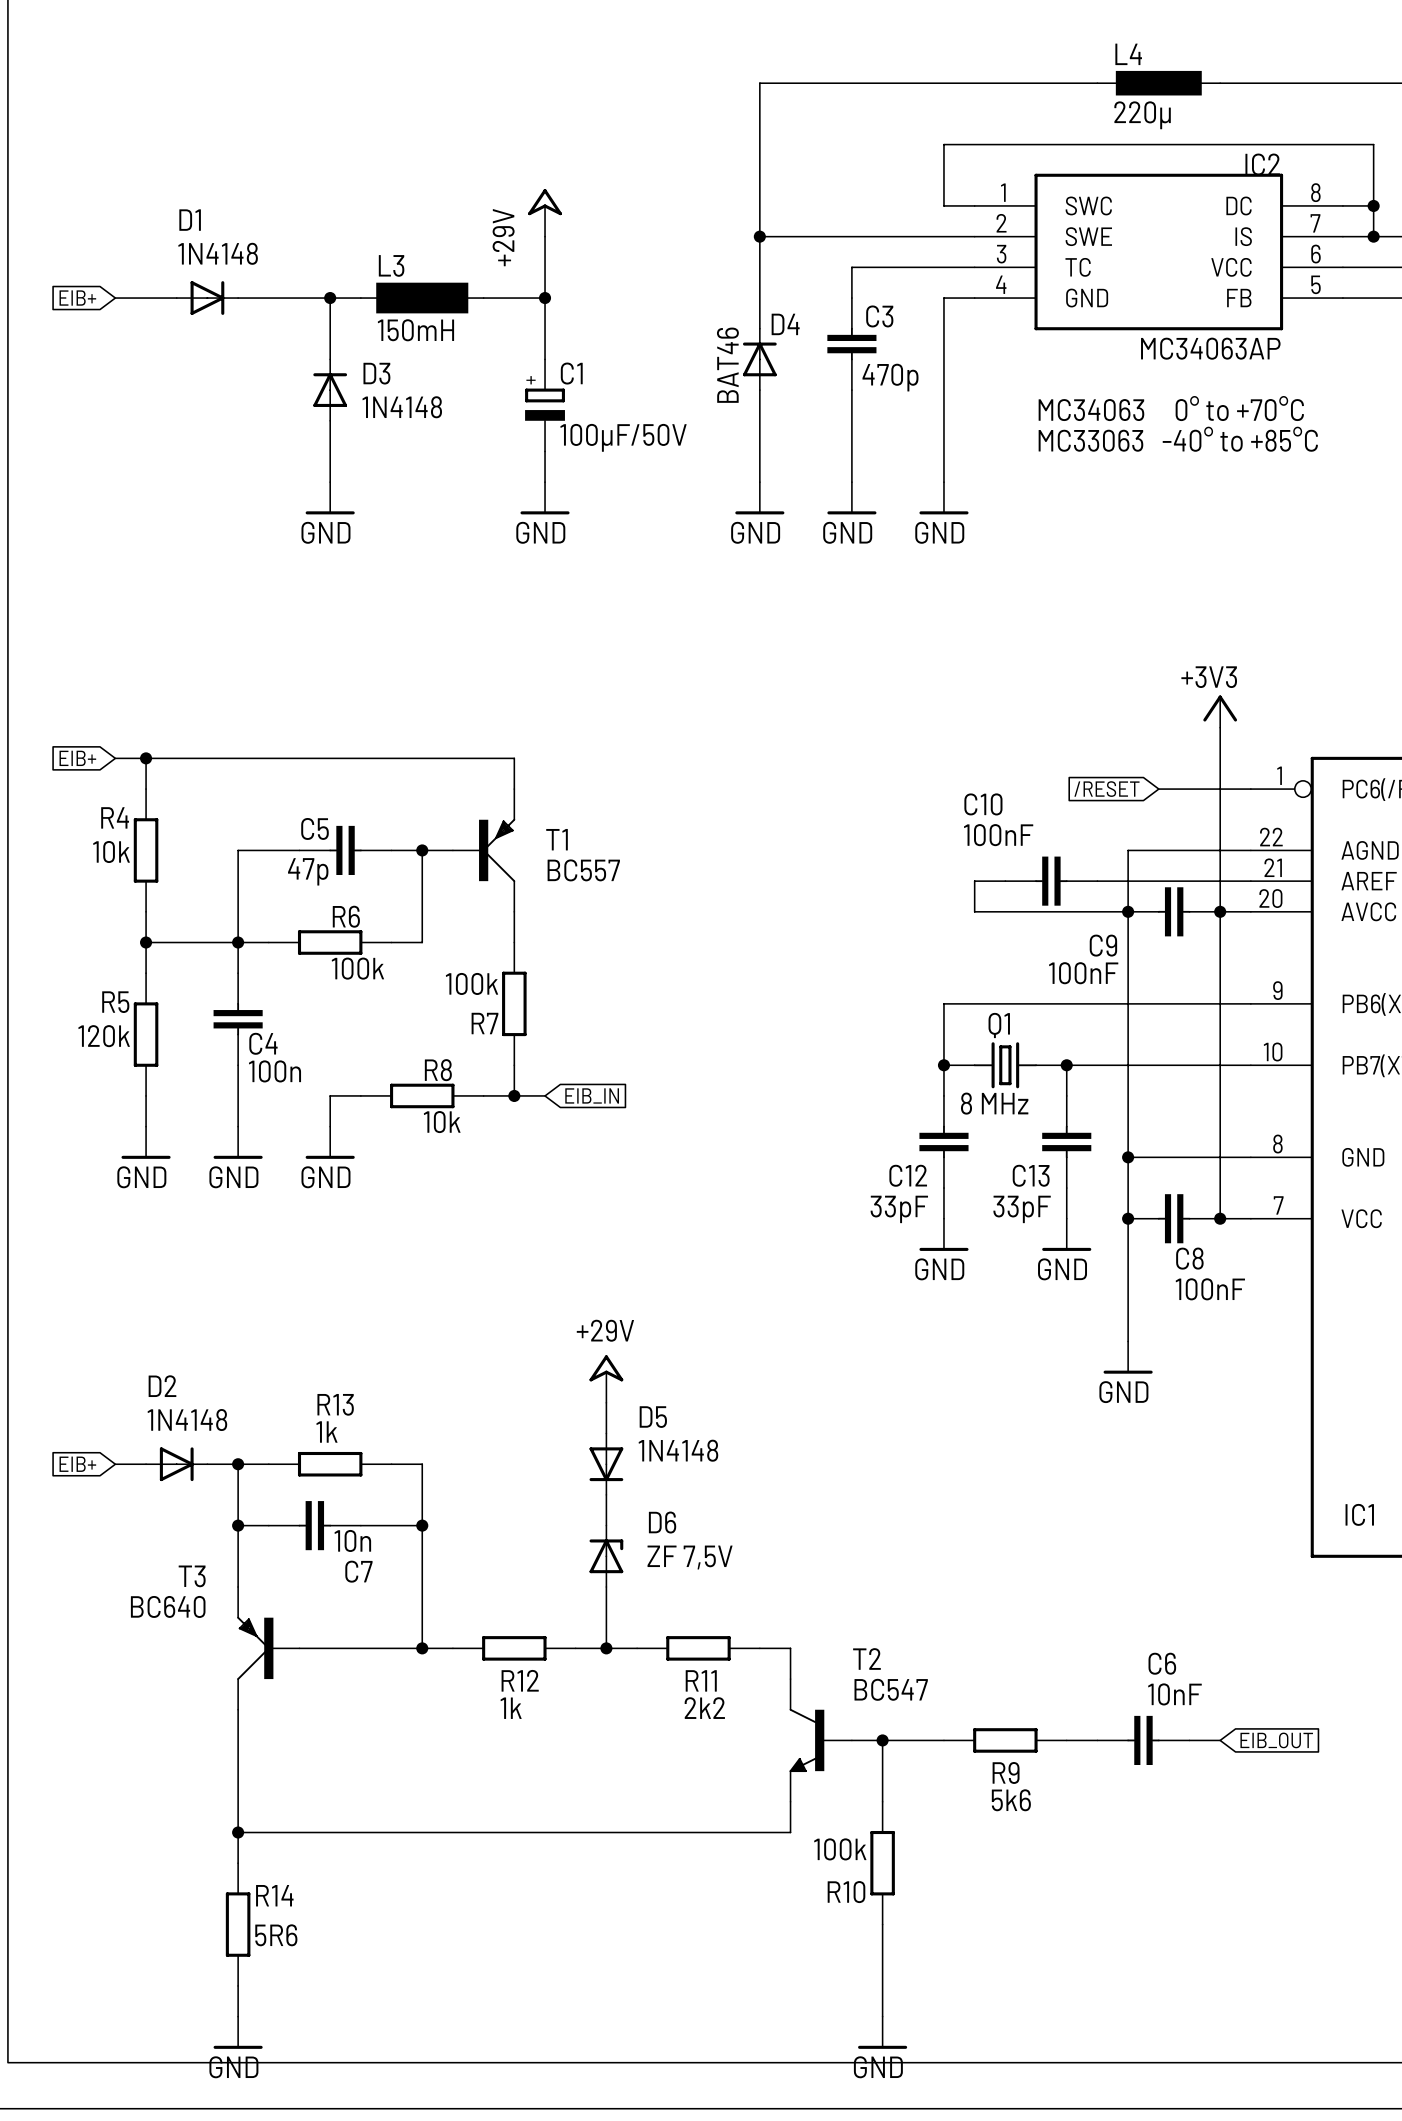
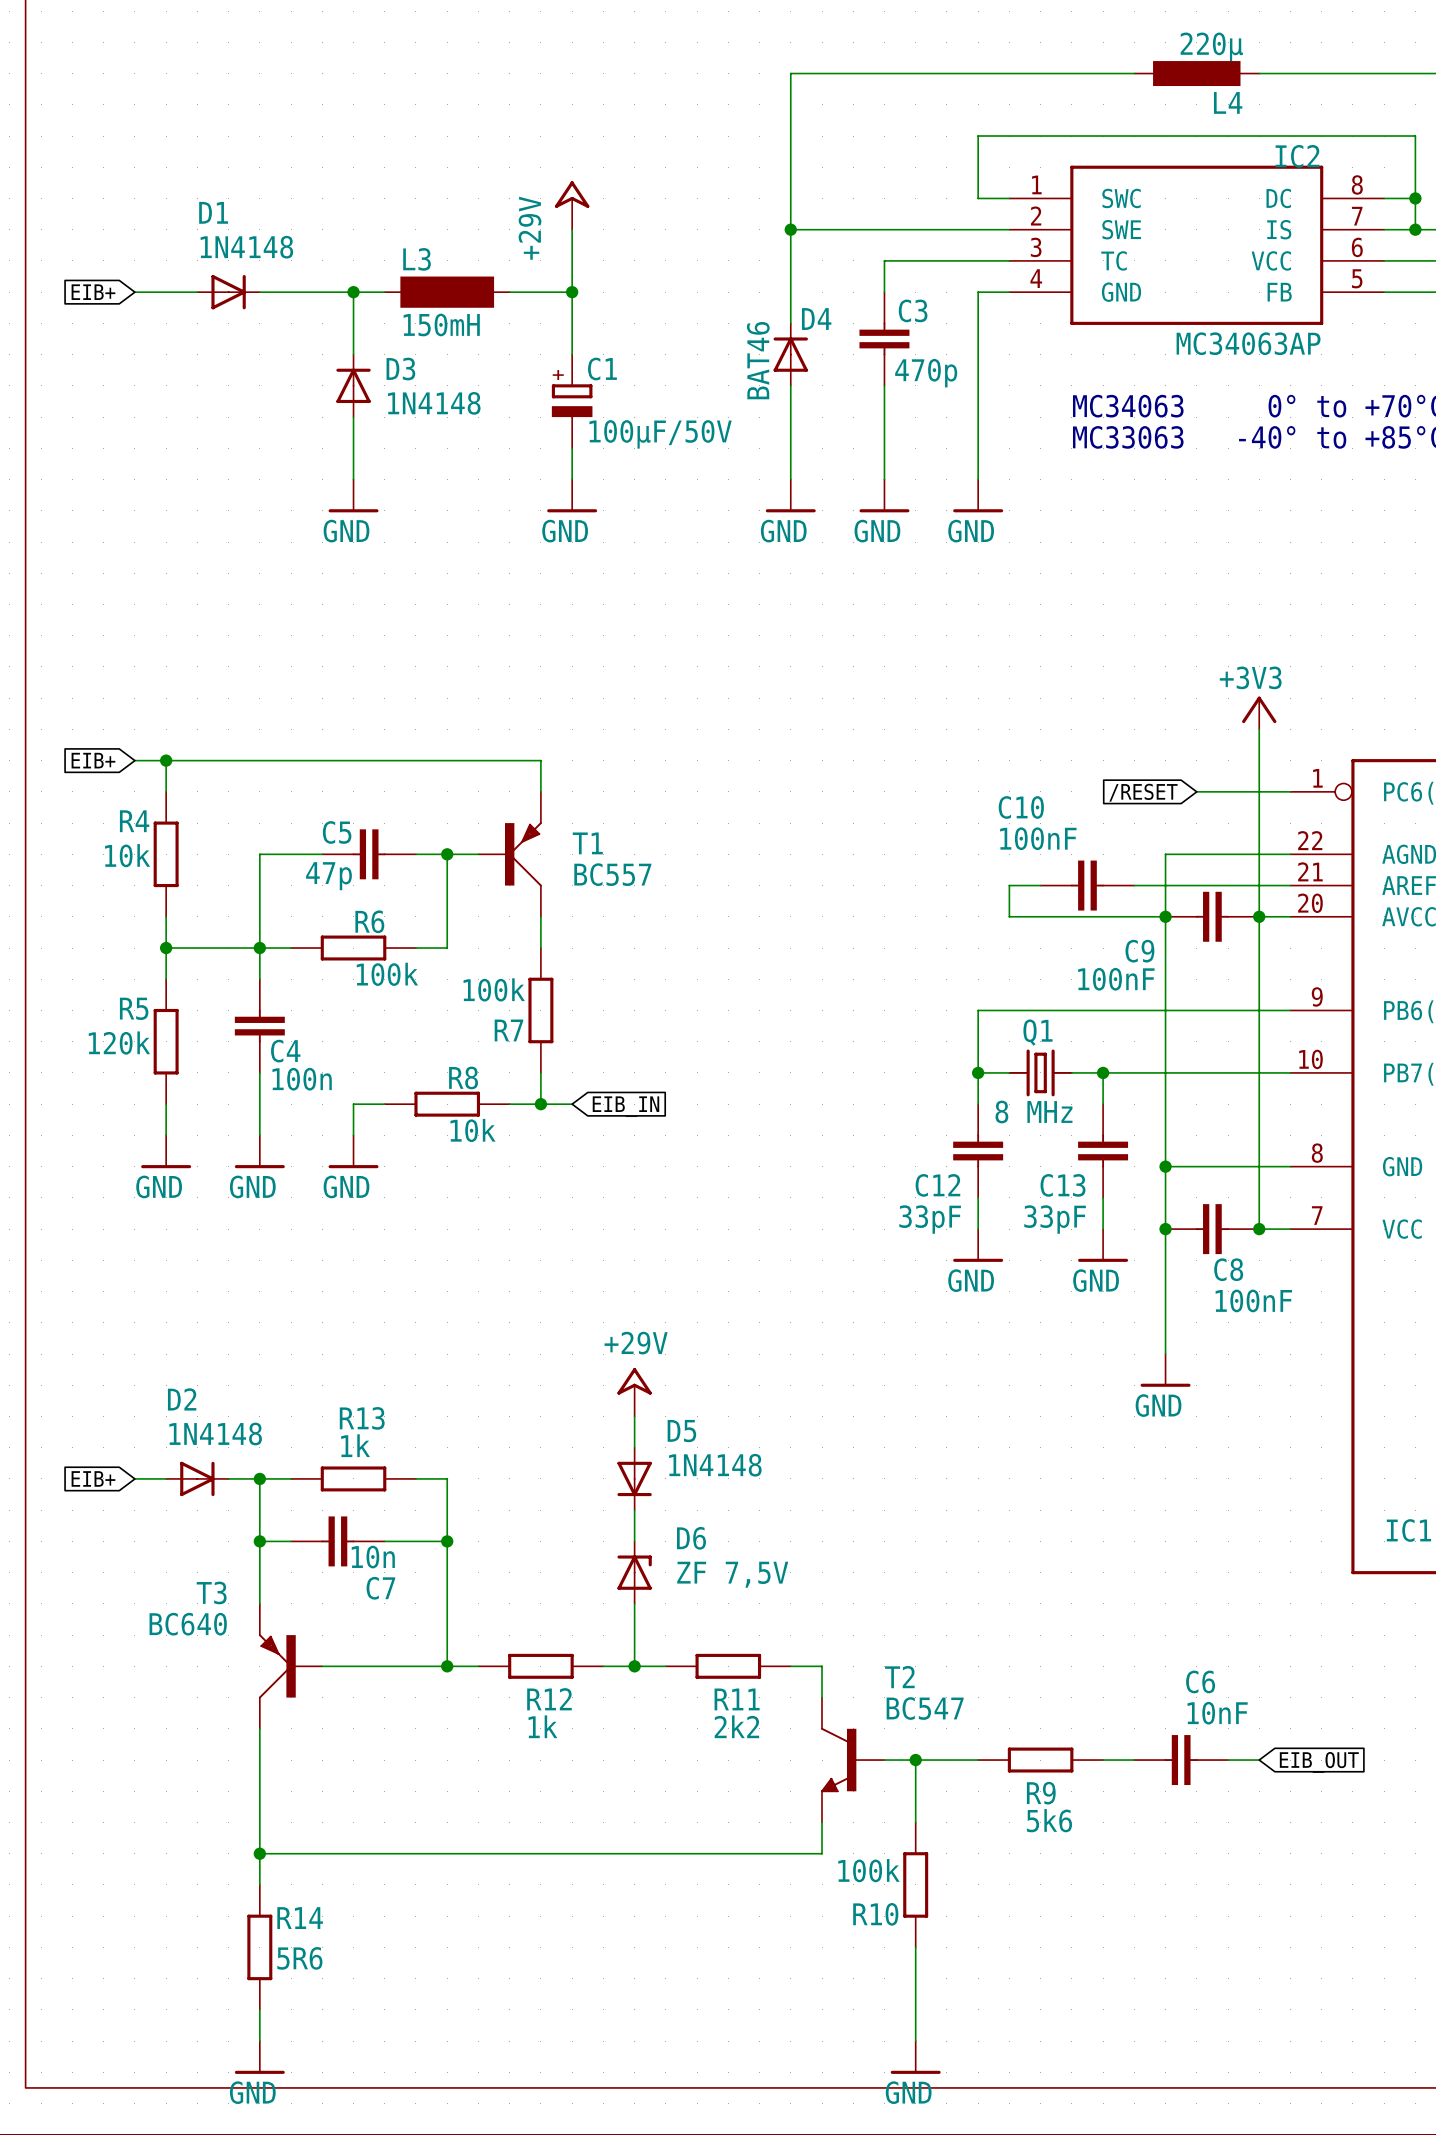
L4 name position: L4 (1128, 54) -> L4 (1228, 102)
L4 value position: 220µ (1142, 115) -> 220µ (1211, 46)

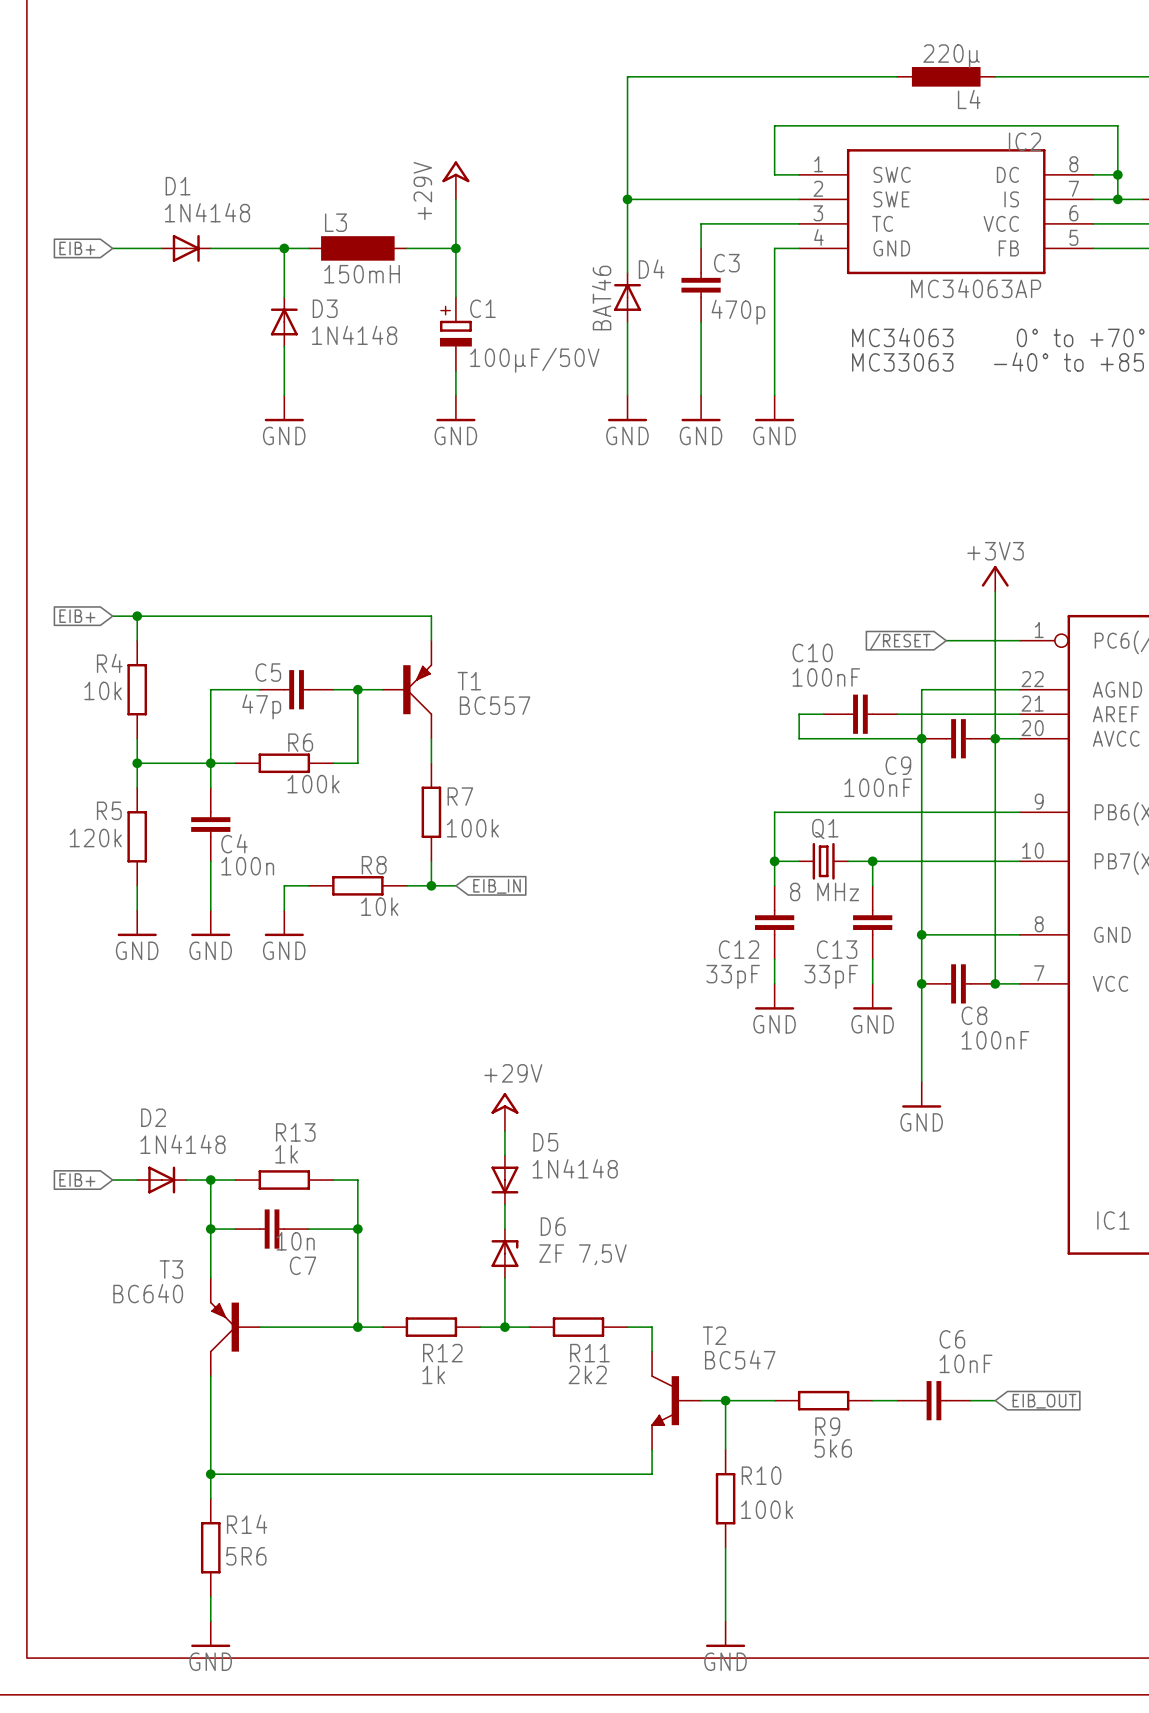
R7 value position: 100k (494, 989) -> 100k (472, 828)
R7 name position: R7 (508, 1030) -> R7 (460, 796)
R10 value position: 100k (869, 1870) -> 100k (767, 1509)
R10 name position: R10 (875, 1914) -> R10 (761, 1475)

